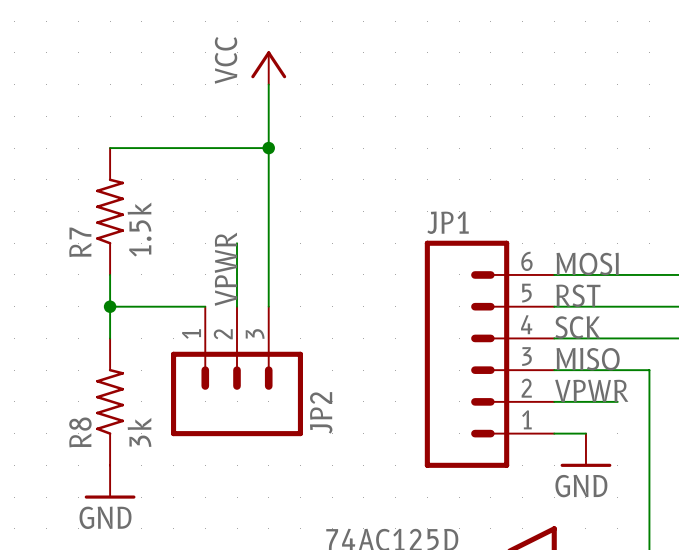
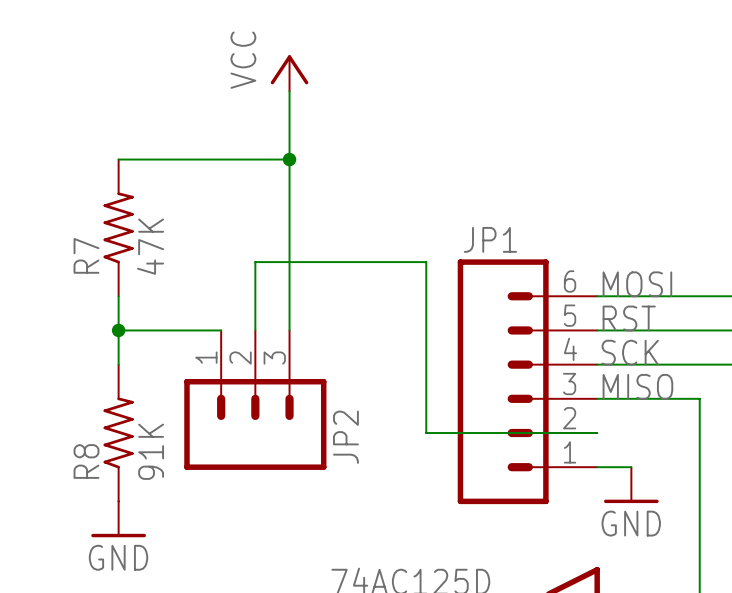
R7 value: 1.5k (139, 229) -> 47K (150, 246)
label: VPWR (226, 269) -> none
label: VPWR (591, 390) -> none
wire: (554, 401) (617, 401) -> (597, 433) (426, 433) (426, 262) (255, 262)
R8 value: 3k (139, 432) -> 91K (151, 451)

